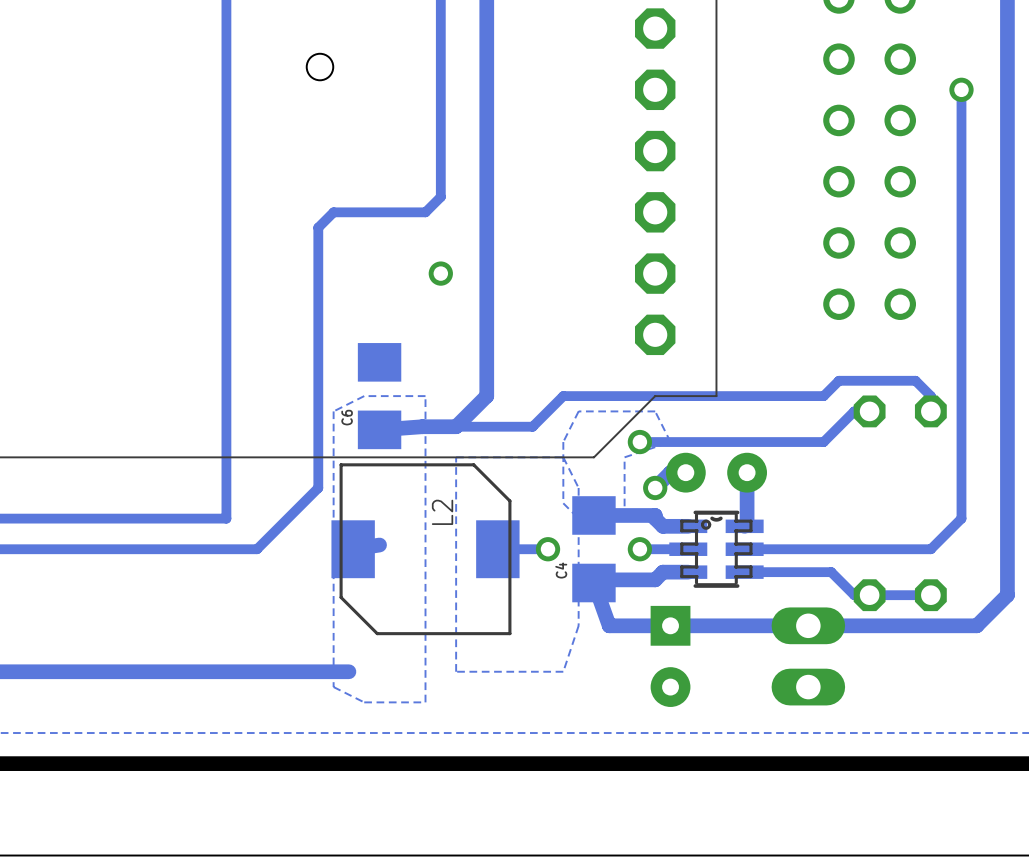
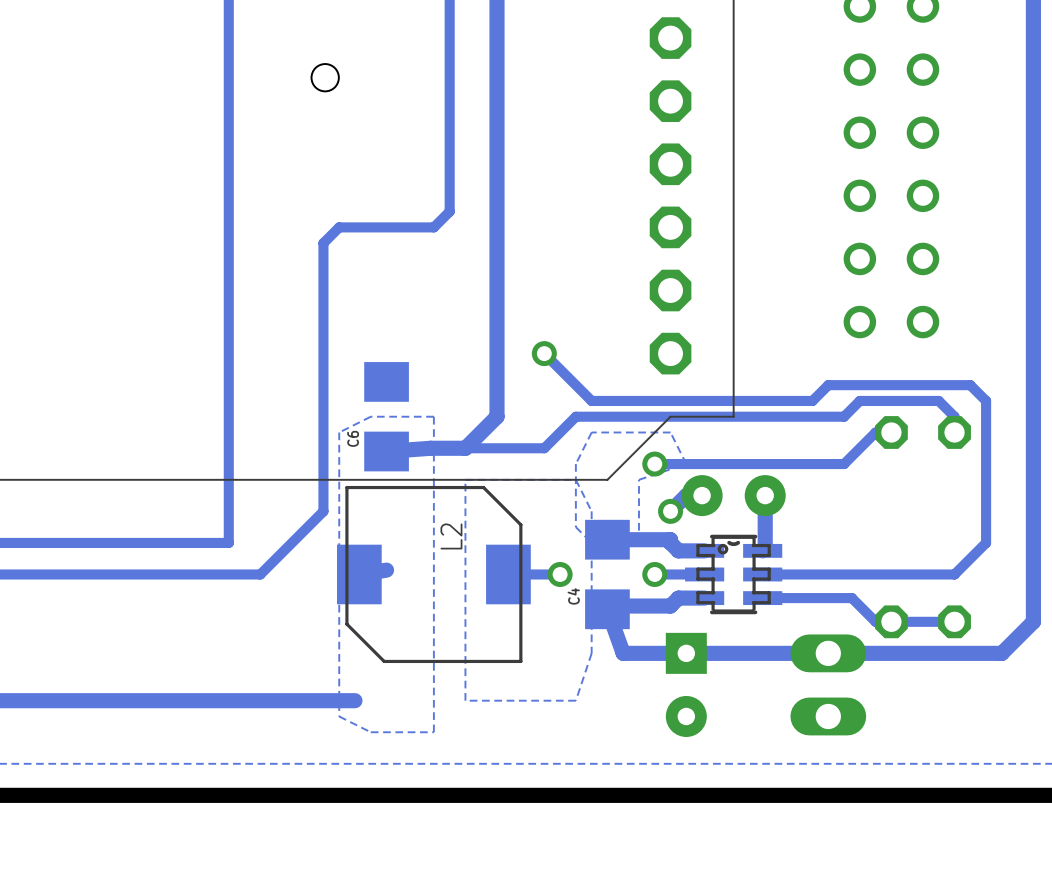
track: (961, 89) (961, 380) -> (544, 353) (591, 400) (812, 400) (828, 385) (970, 385) (986, 400)
via: (961, 89) -> none
via position: (440, 273) -> (544, 353)

